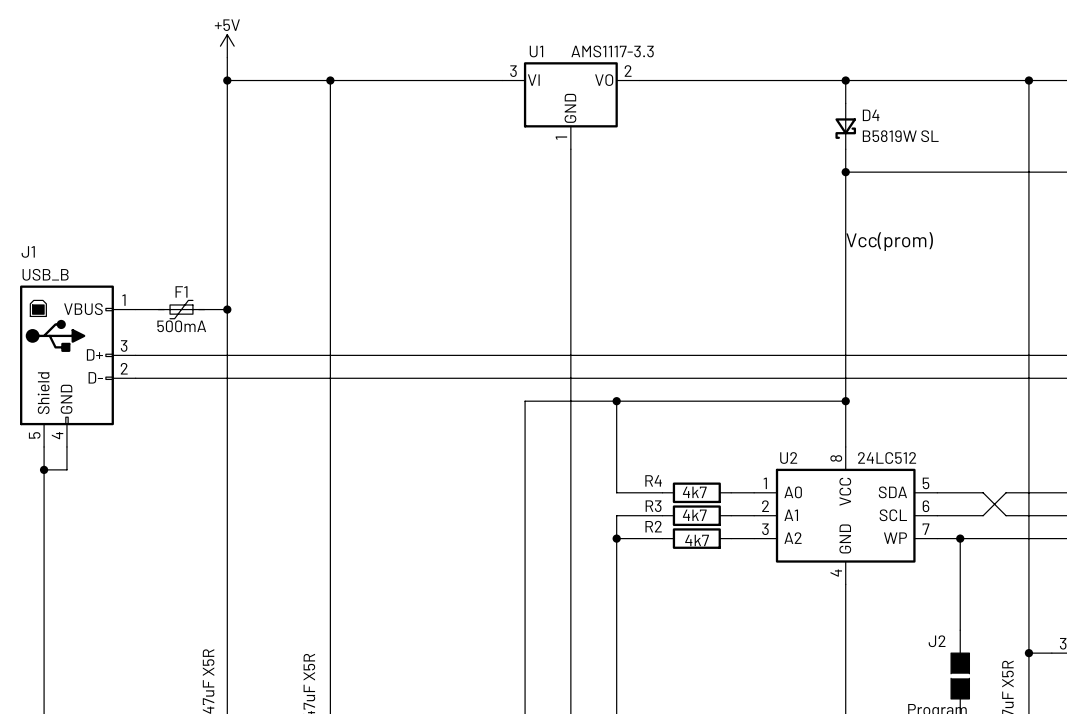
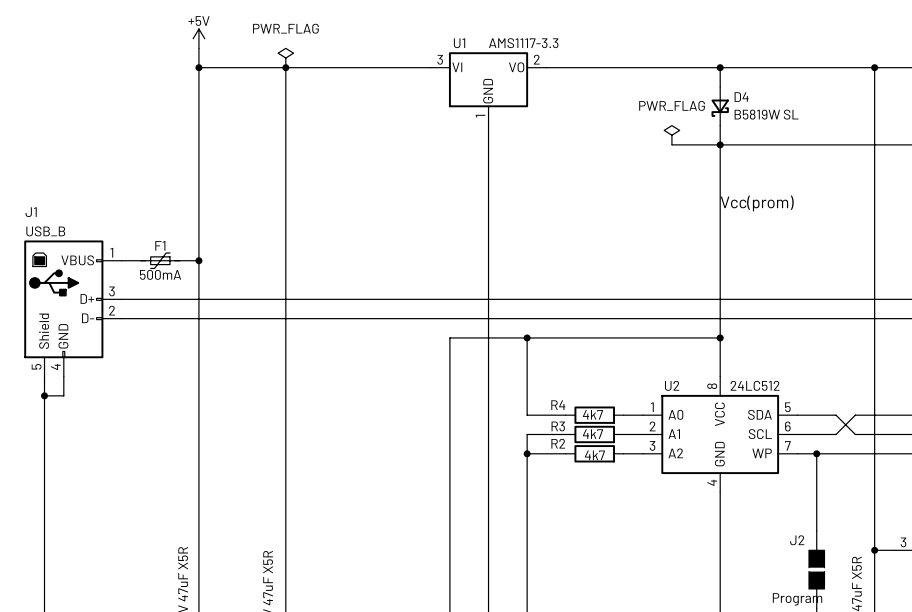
power symbol: none -> PWR_FLAG (285, 58)
power symbol: none -> PWR_FLAG (671, 135)
wire: none -> (671, 144) (720, 144)

